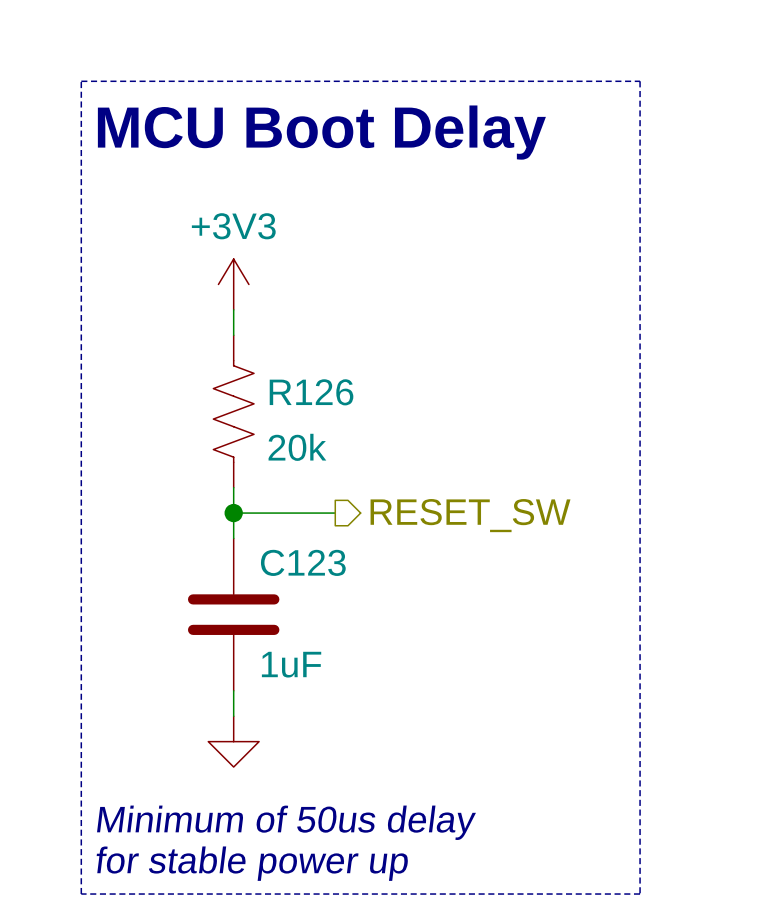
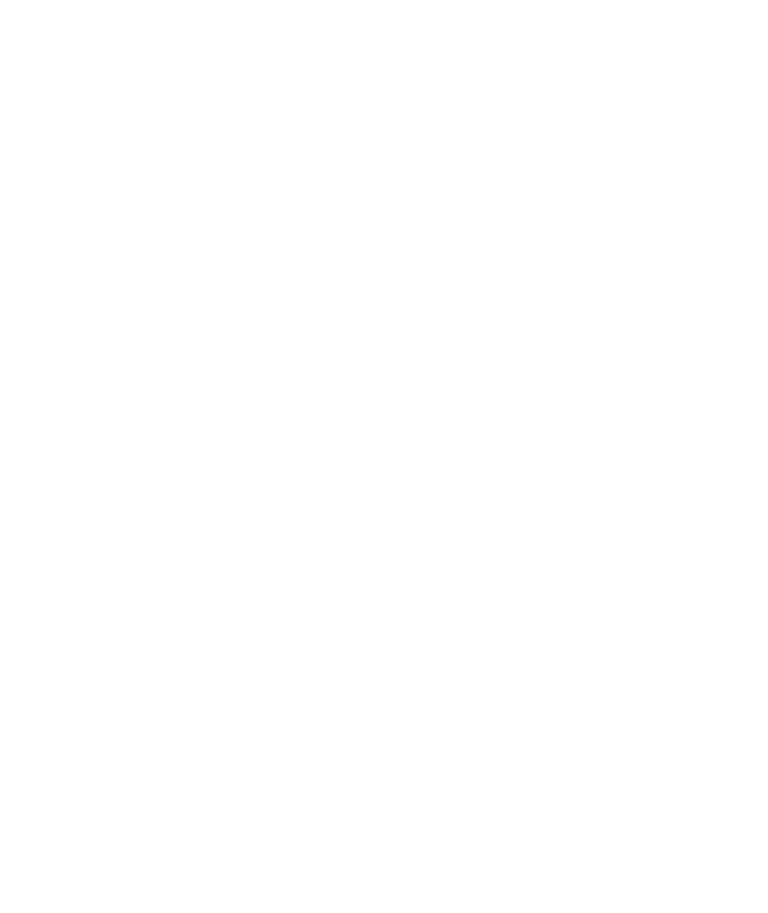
line: (81, 81) (640, 81) (640, 894) (81, 894) (81, 81) -> none
text: MCU Boot Delay (321, 132) -> none
power symbol: +3V3 (233, 284) -> none
wire: (233, 309) (233, 335) -> none
R126: 20k (233, 411) -> none
wire: (233, 487) (233, 538) -> none
wire: (233, 513) (335, 513) -> none
junction: (233, 513) -> none
hierarchical label: RESET_SW (470, 515) -> none
C123: 1uF (233, 614) -> none
wire: (233, 690) (233, 716) -> none
power symbol: (233, 741) -> none
text: Minimum of 50us delay (286, 822) -> none
text: for stable power up (252, 863) -> none

